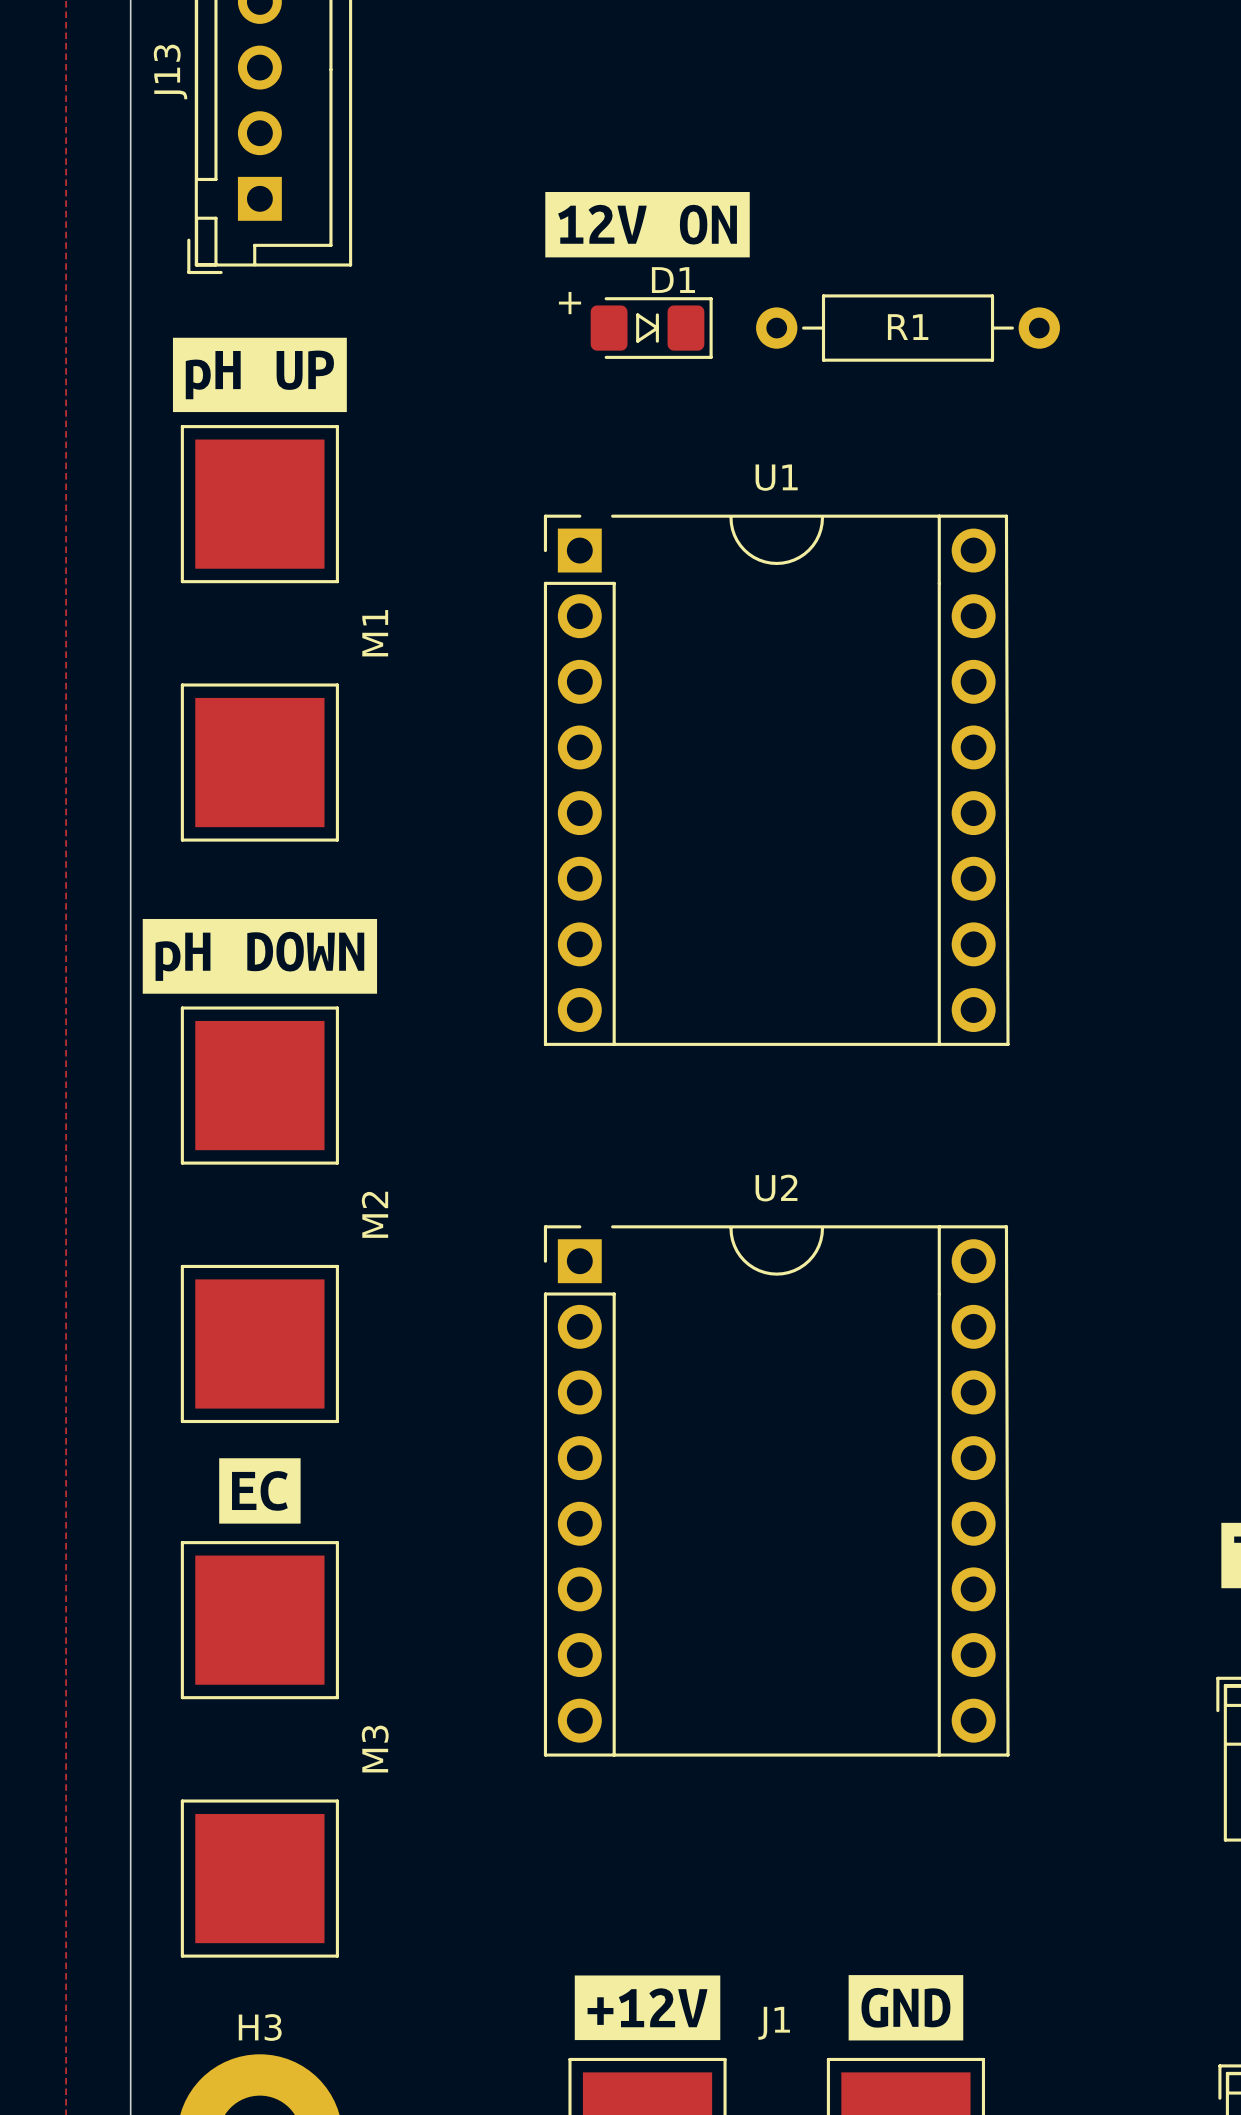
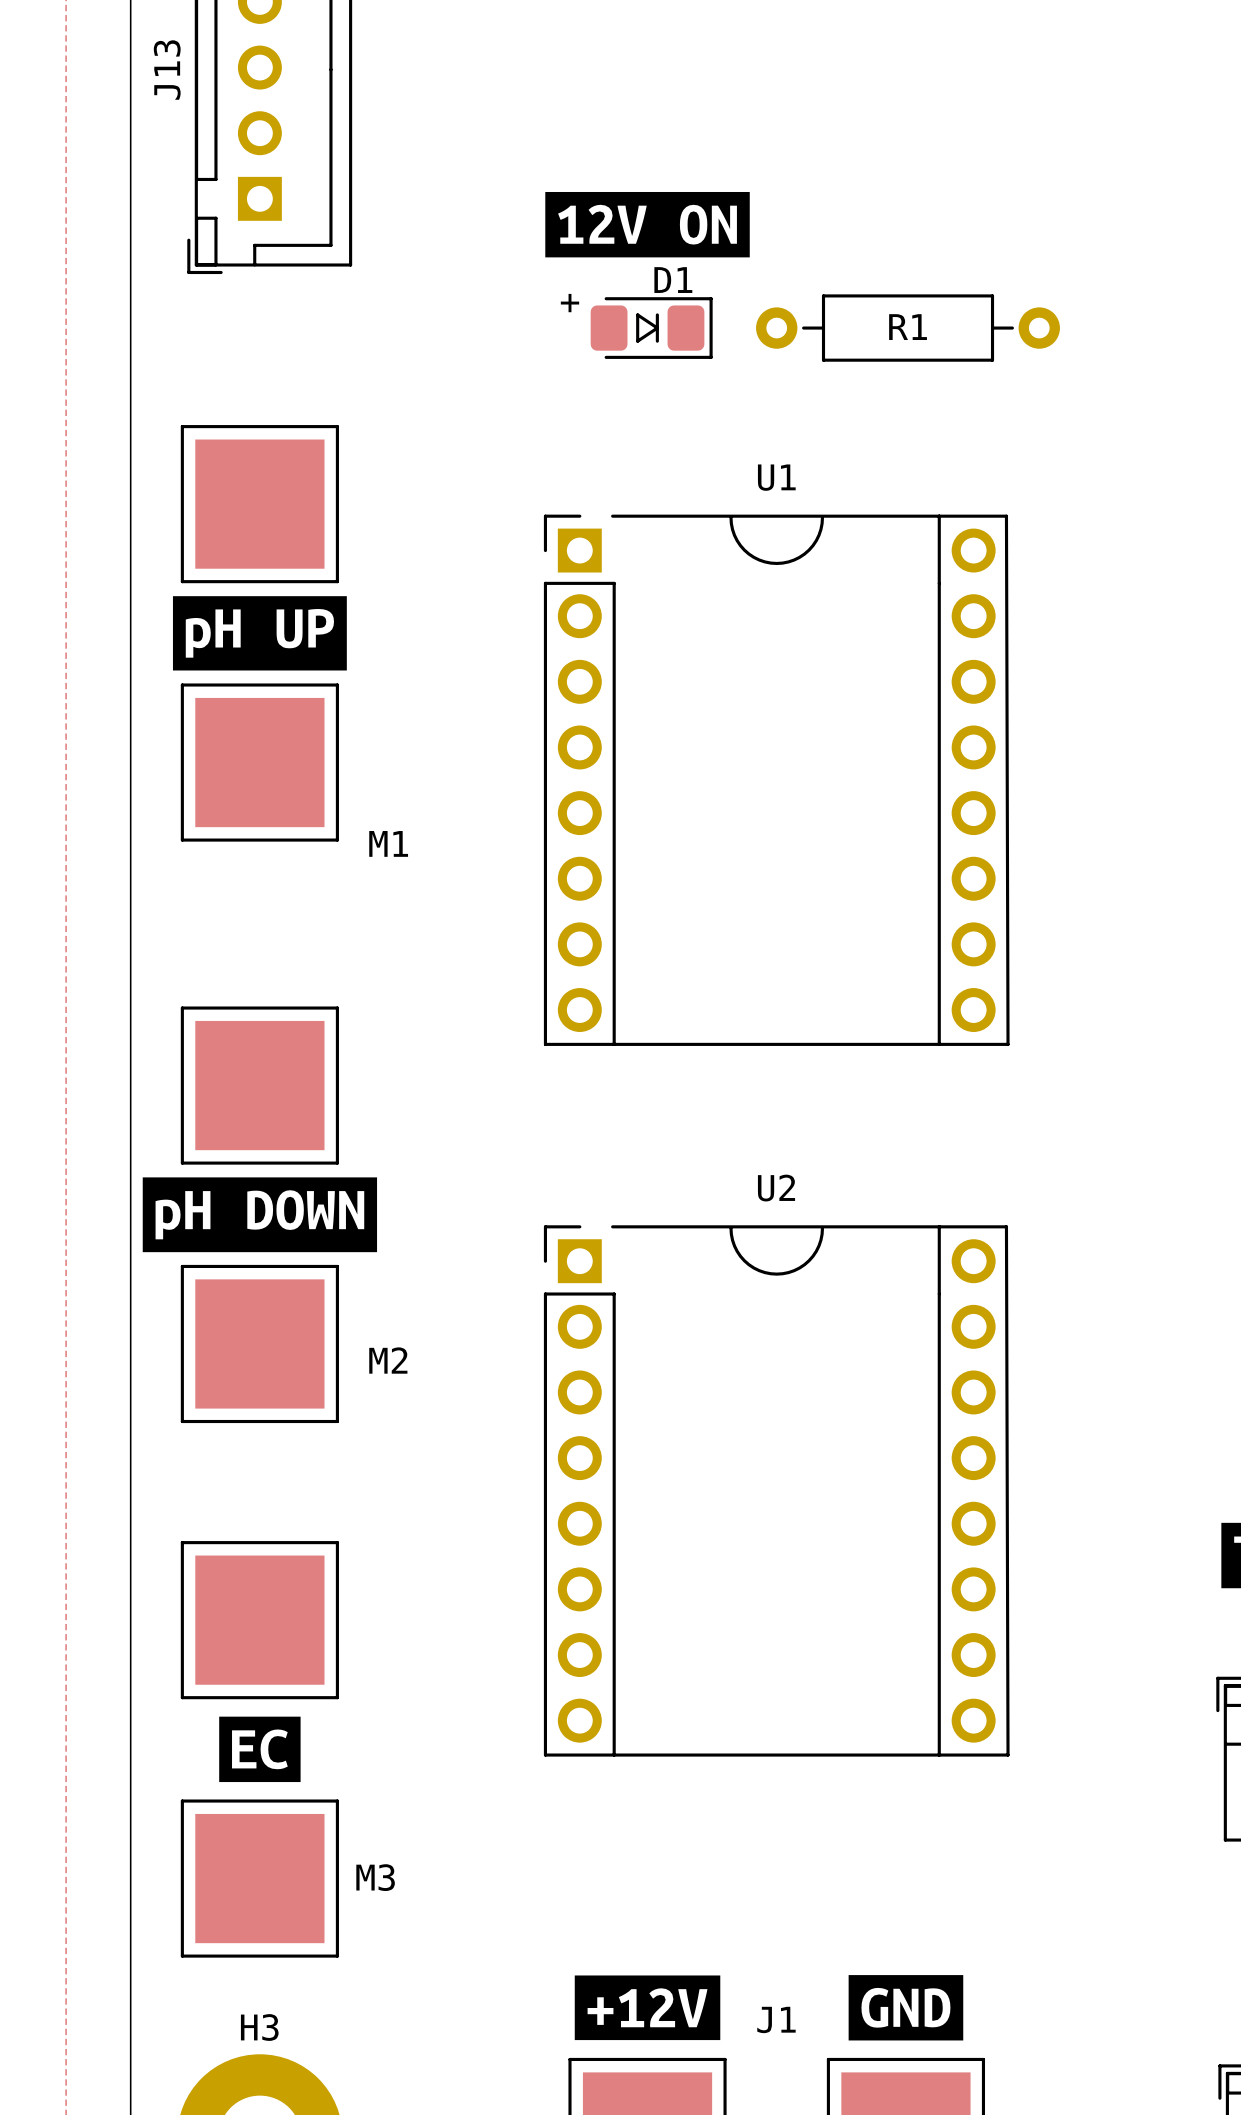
drawing position: (259, 374) -> (259, 633)
M1 name rotation: 0° (375, 633) -> 90° clockwise (388, 843)
M1 name position: M1 (375, 633) -> M1 (388, 843)
drawing position: (259, 956) -> (259, 1214)
M2 name rotation: 0° (374, 1214) -> 90° clockwise (388, 1360)
M2 name position: M2 (374, 1214) -> M2 (388, 1360)
drawing position: (259, 1490) -> (259, 1749)
M3 name rotation: 0° (375, 1749) -> 90° clockwise (375, 1877)
M3 name position: M3 (375, 1749) -> M3 (375, 1877)

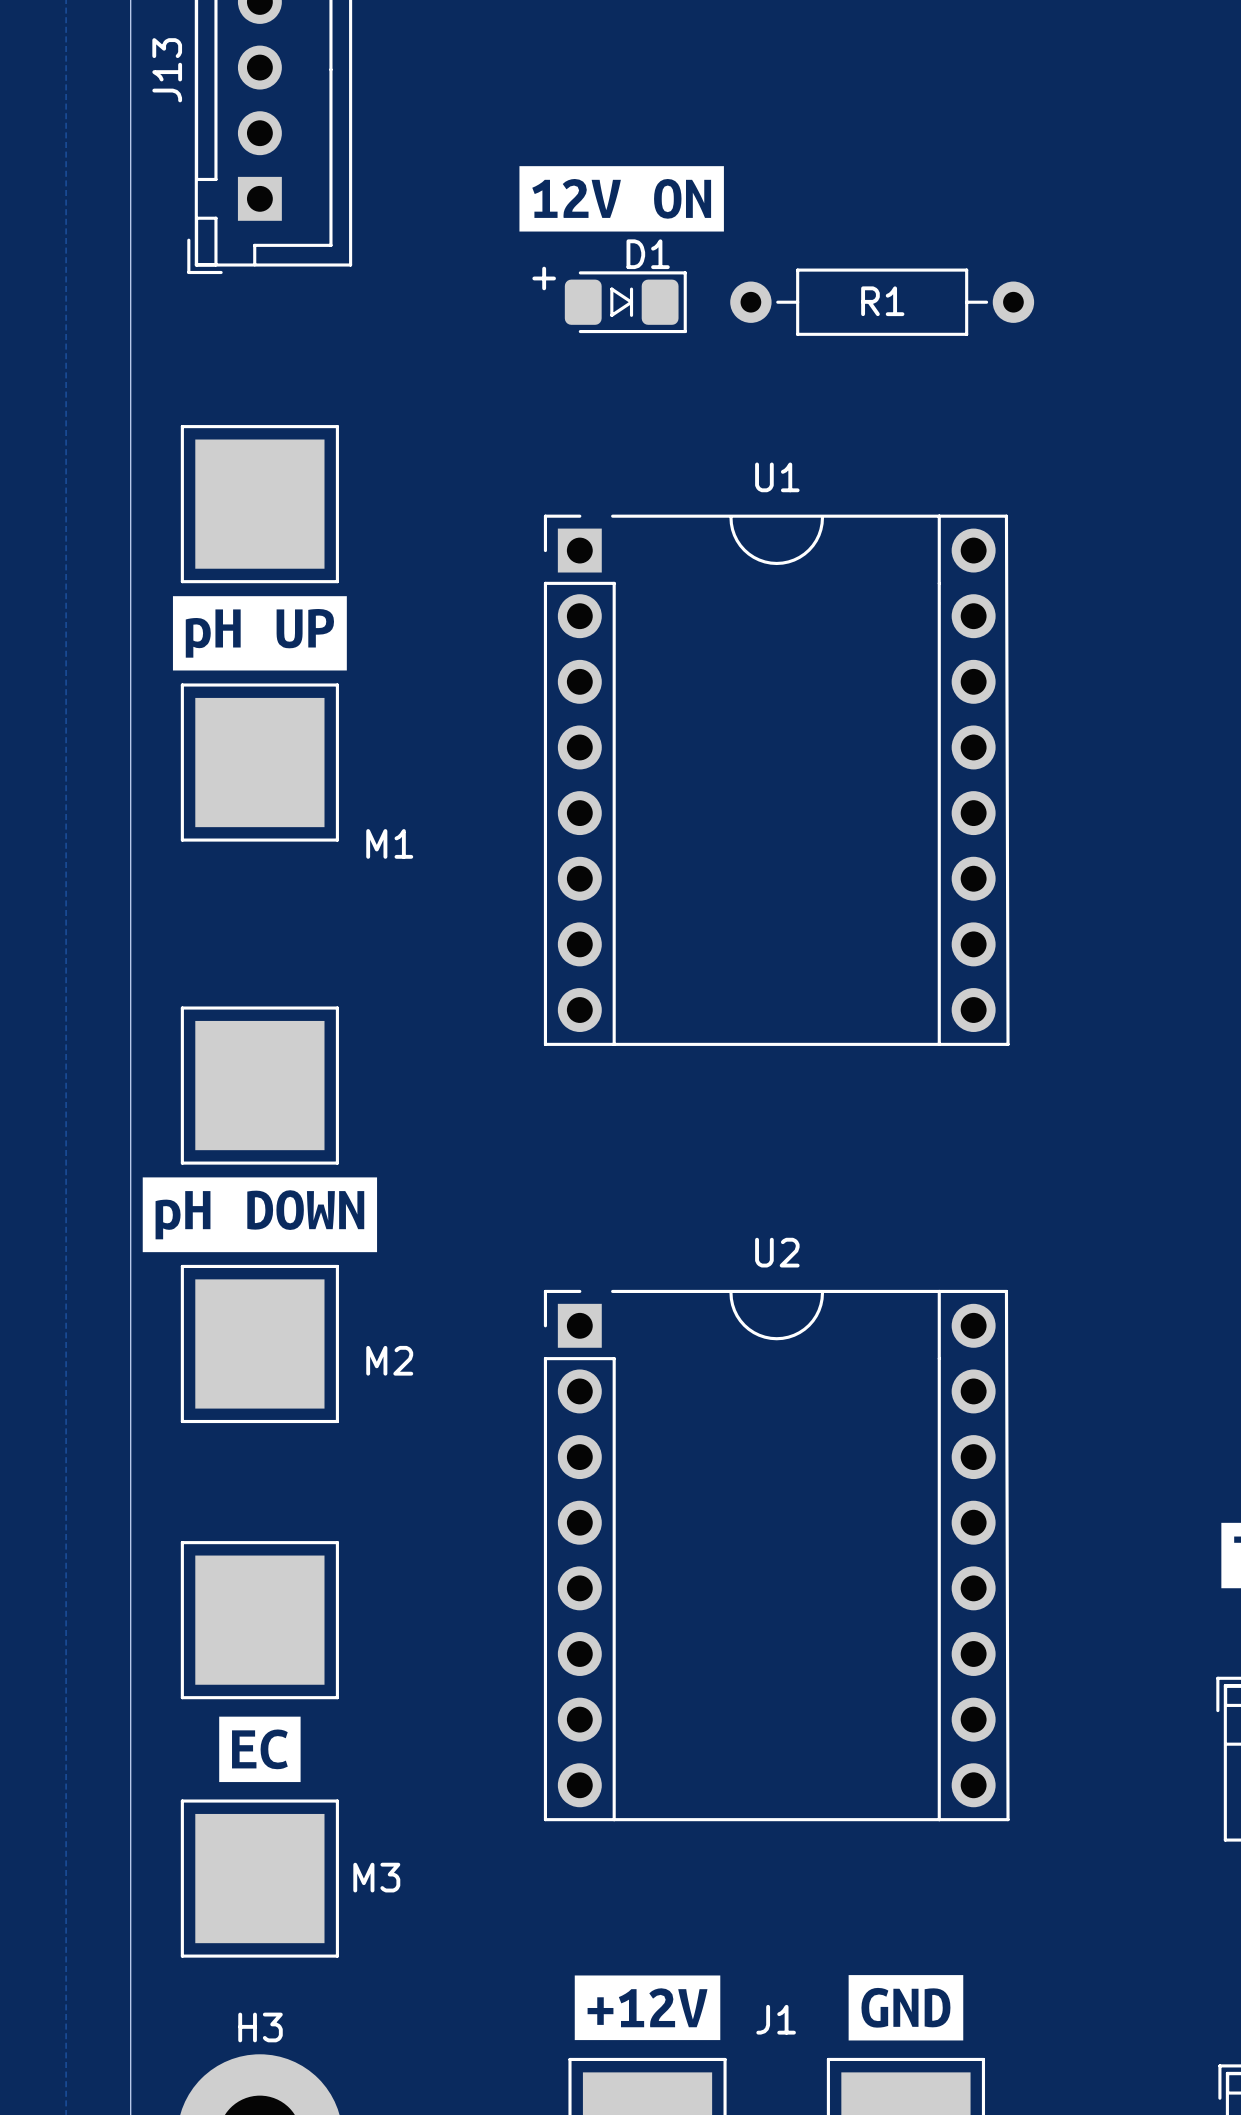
drawing position: (647, 224) -> (621, 198)
D1 position: (651, 328) -> (625, 302)
R1 position: (908, 328) -> (882, 302)
U2 position: (776, 1490) -> (776, 1555)

